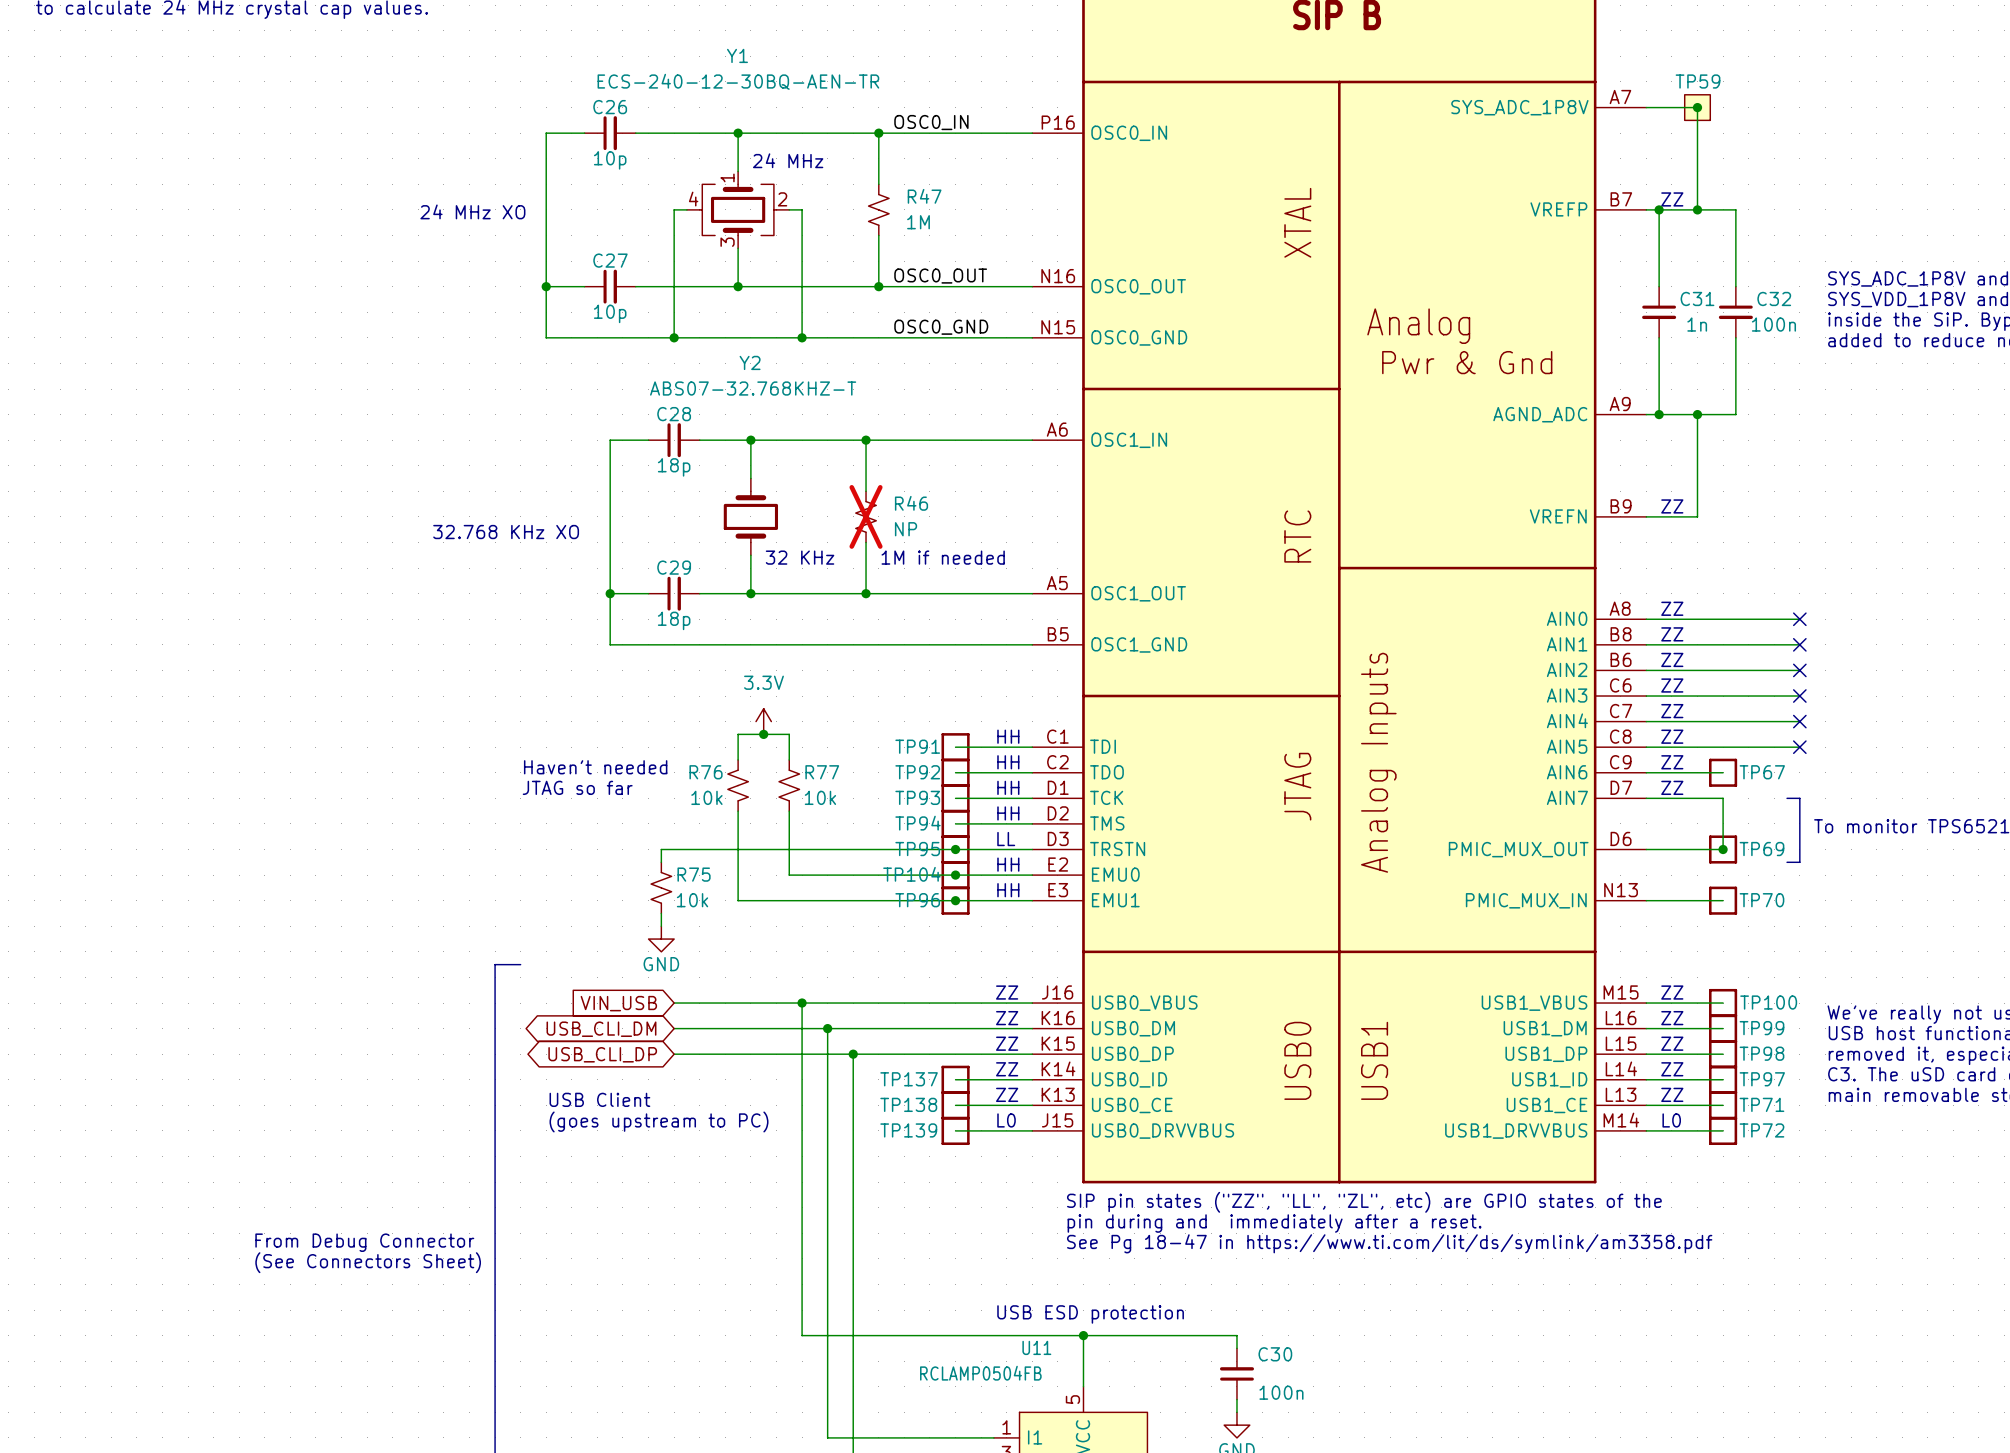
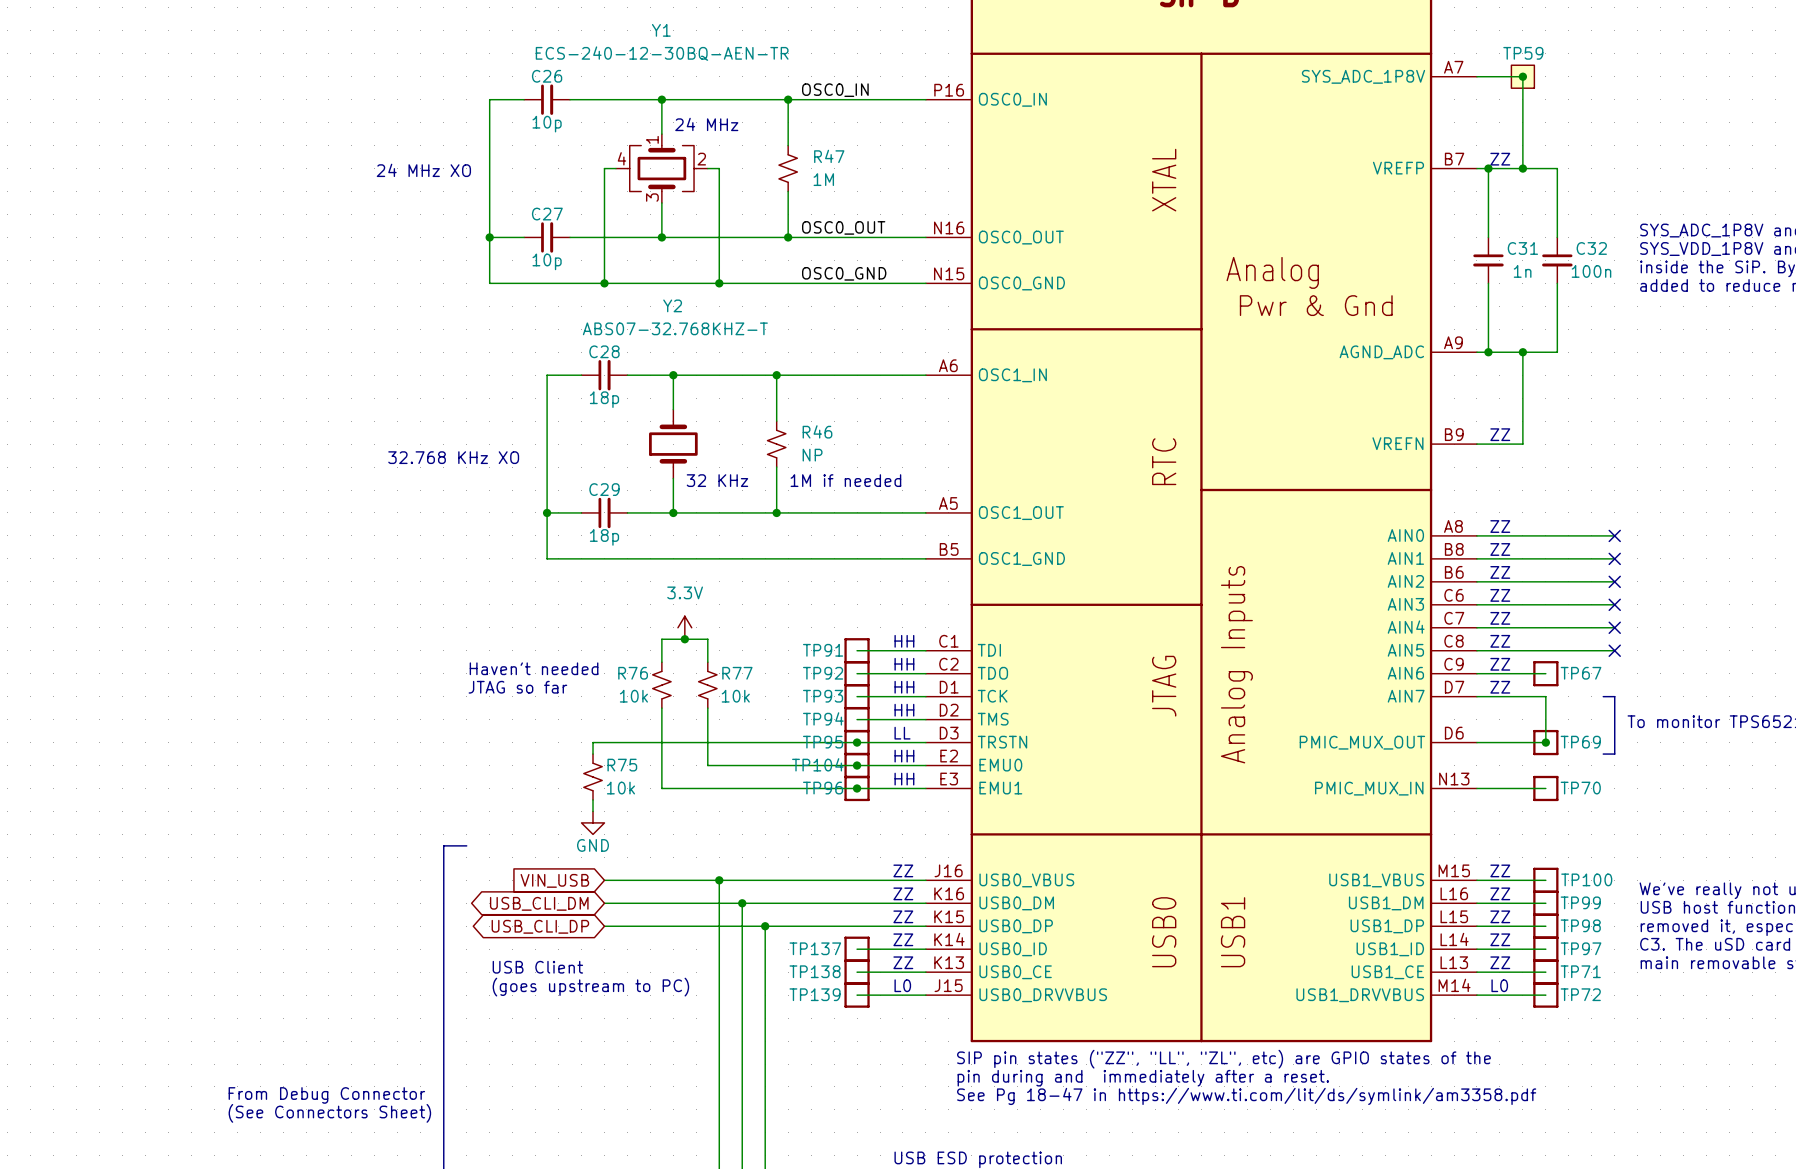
R46 do-not-place cross: (866, 516) -> none

